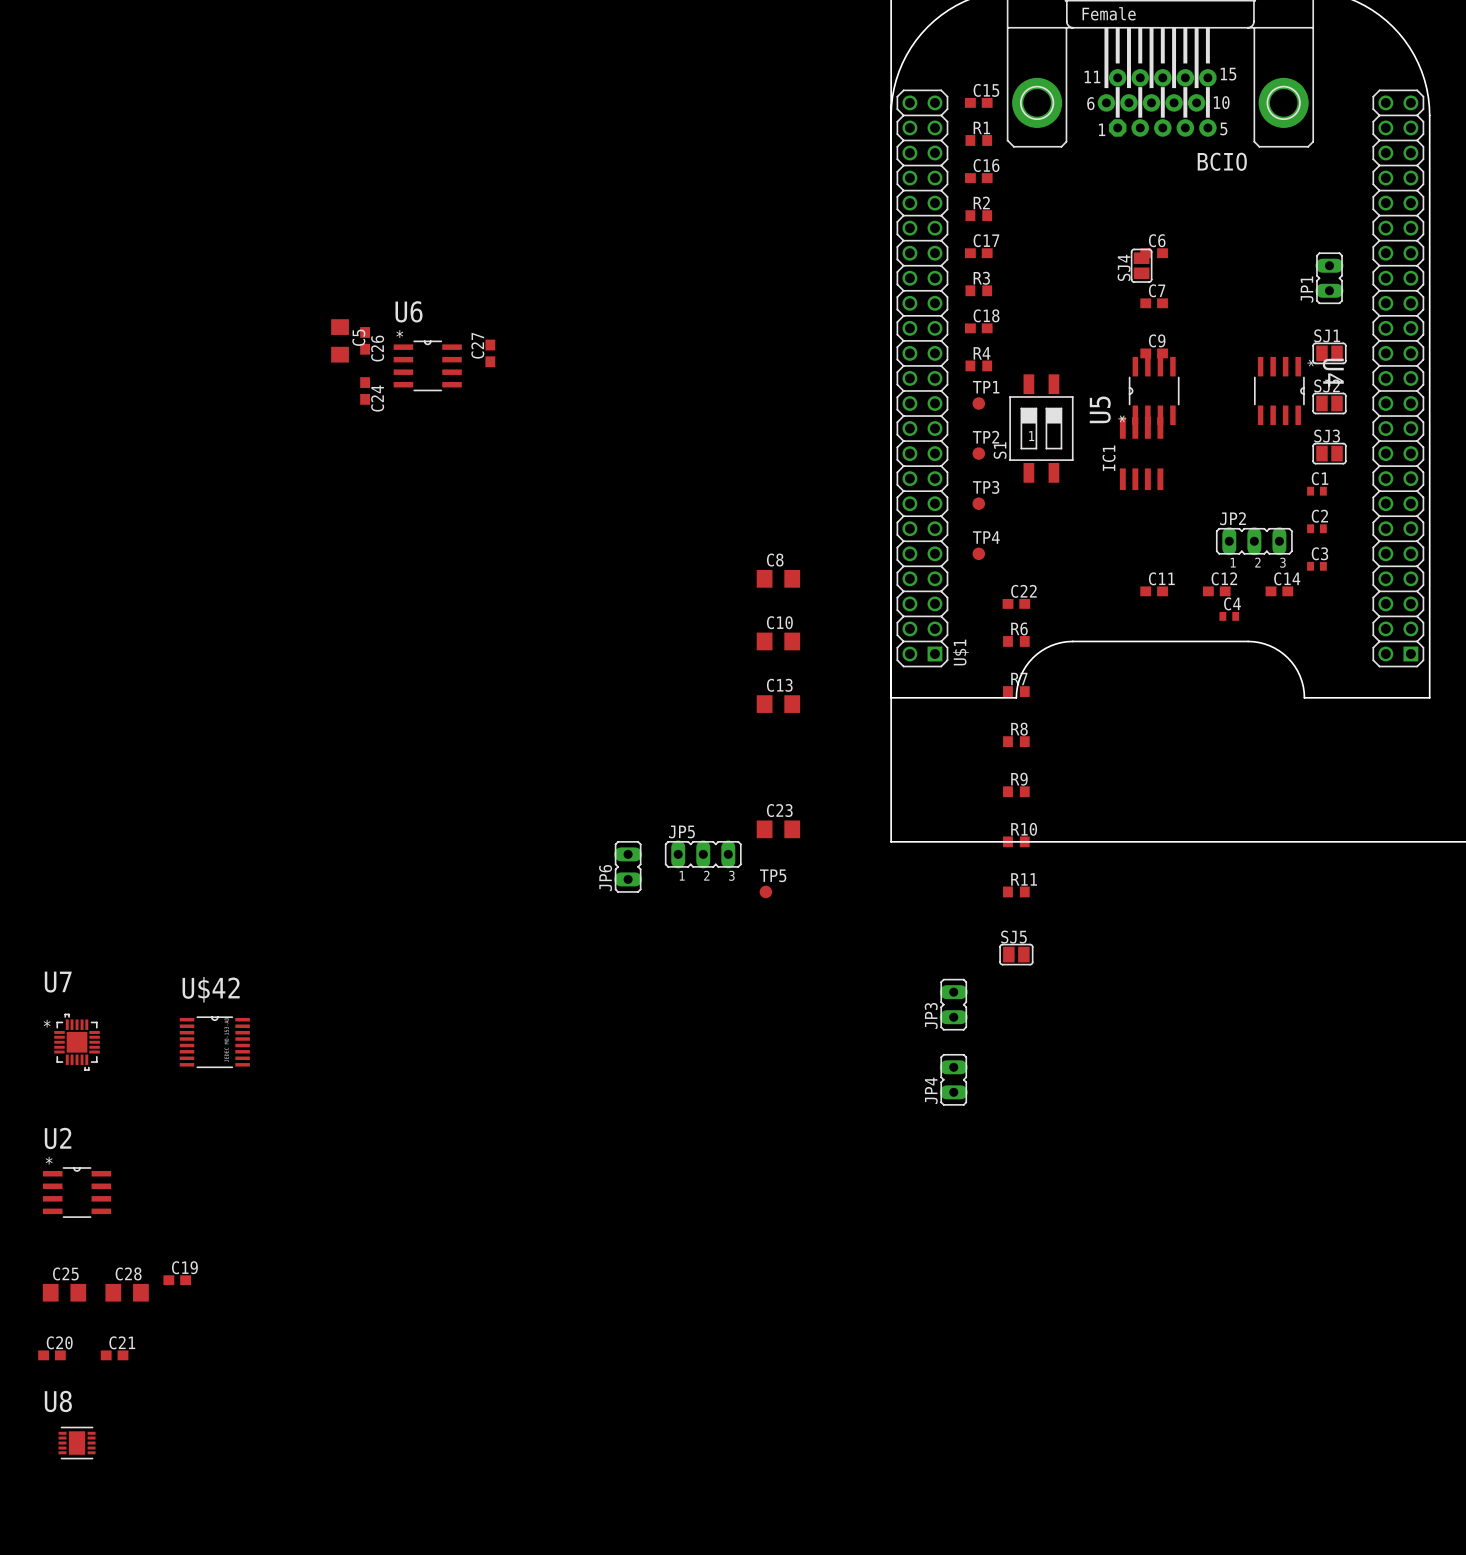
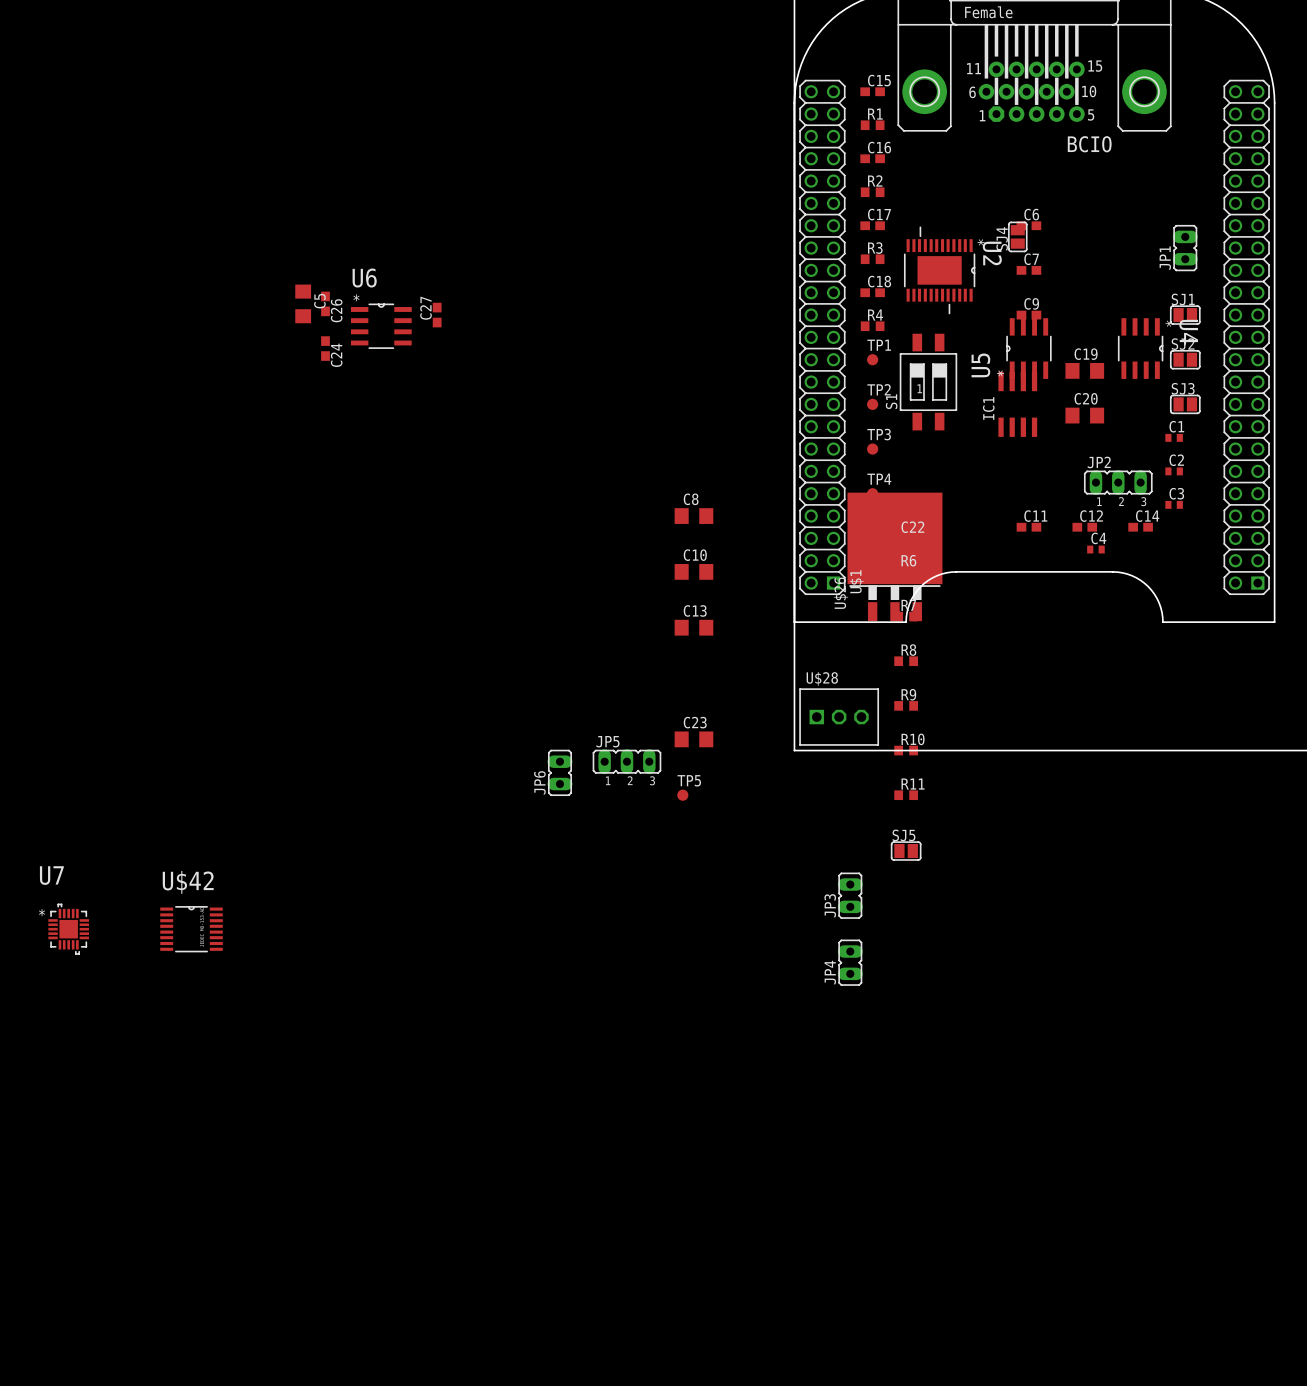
U$26: none -> (894, 556)
U$28: none -> (839, 717)
U2 name position: U2 (58, 1138) -> U2 (992, 253)
U2 footprint: [42, 1167, 112, 1218] -> [904, 226, 976, 315]
C19 footprint: [163, 1275, 192, 1286] -> [1065, 362, 1105, 379]
C25: (64, 1292) -> none
C28: (127, 1292) -> none
C20 footprint: [38, 1350, 66, 1361] -> [1065, 407, 1105, 424]
C21: (114, 1355) -> none
U8: (77, 1443) -> none

